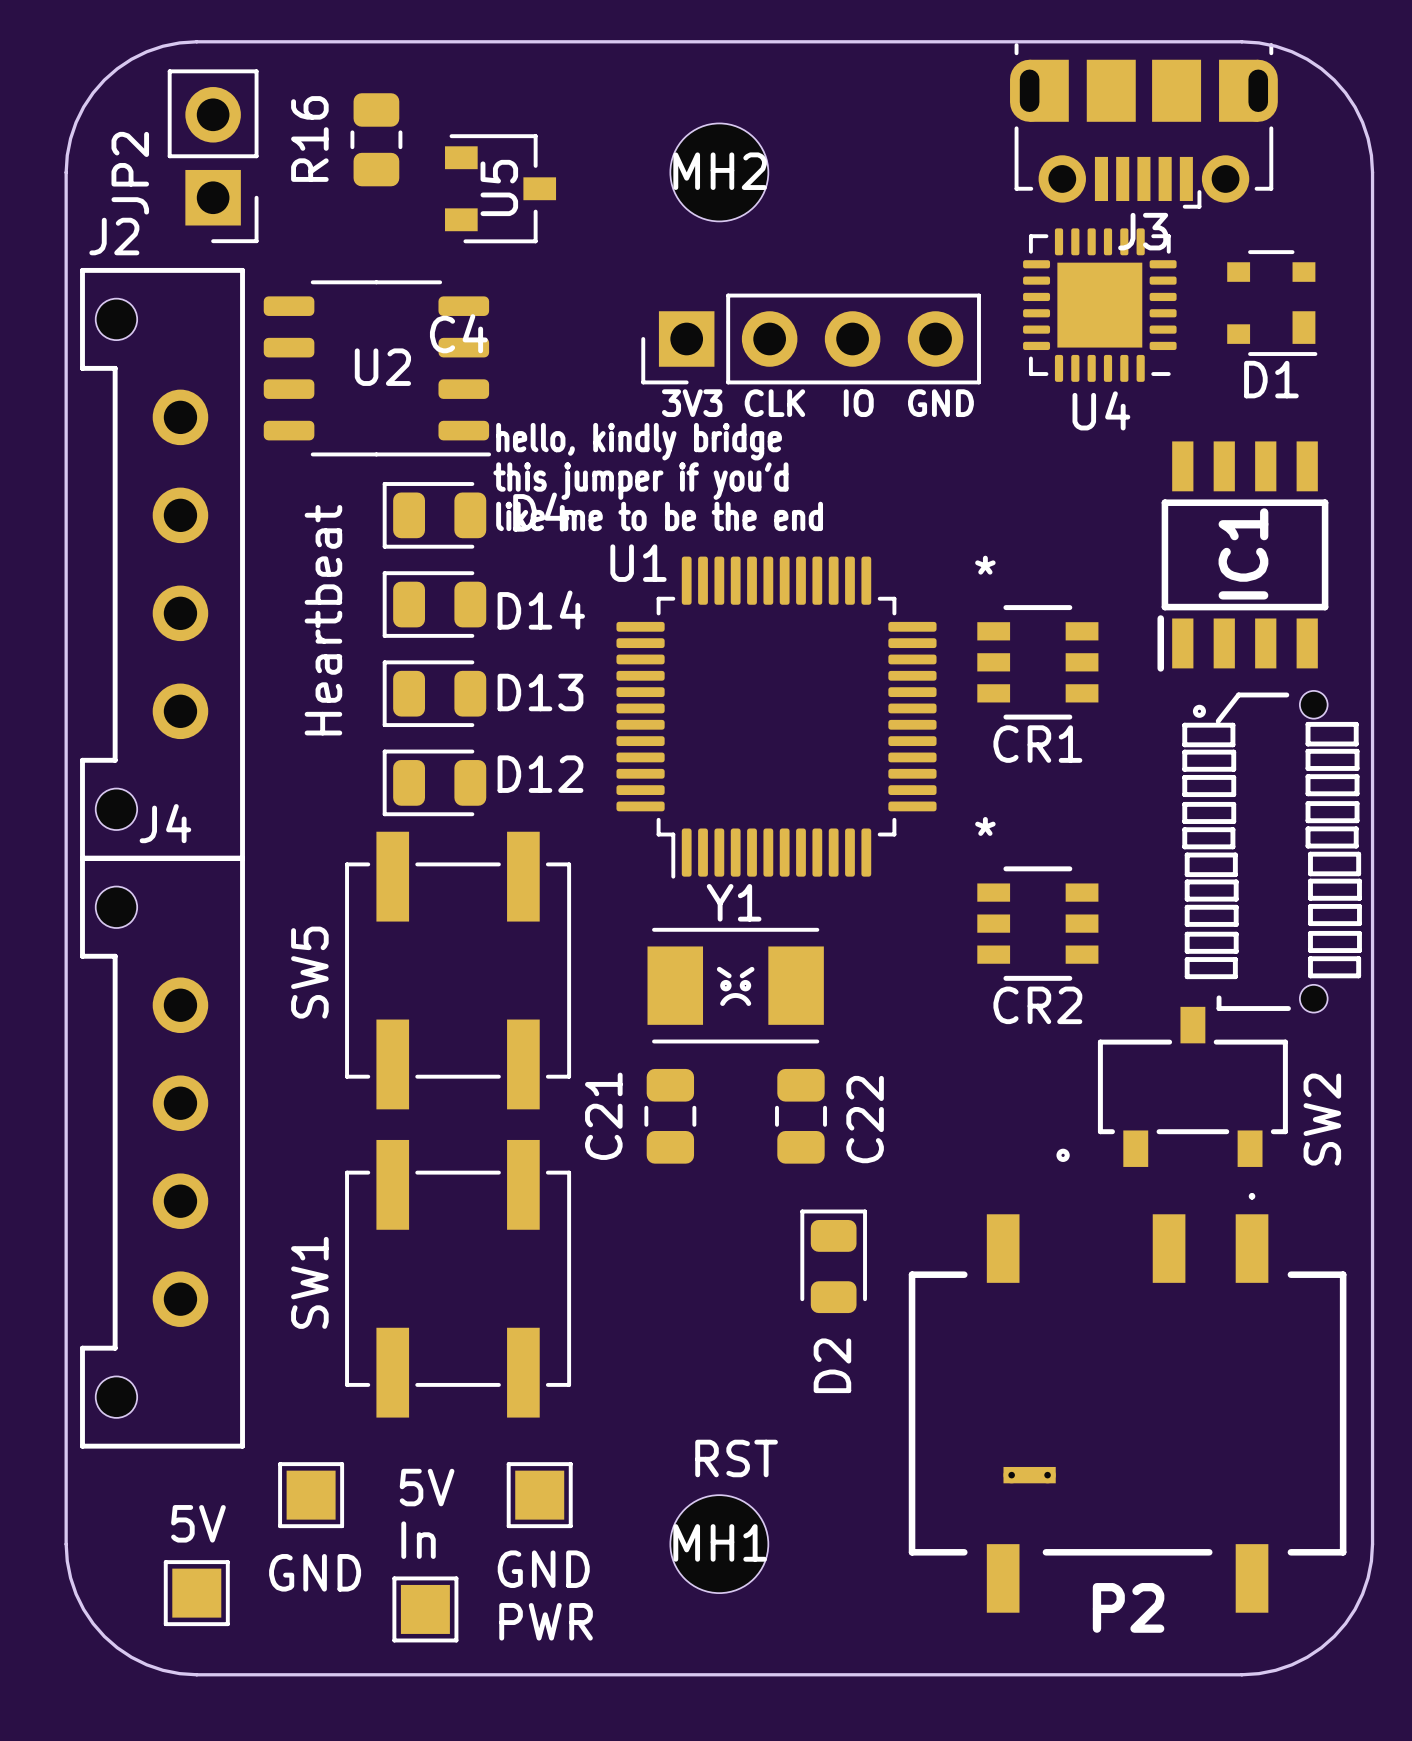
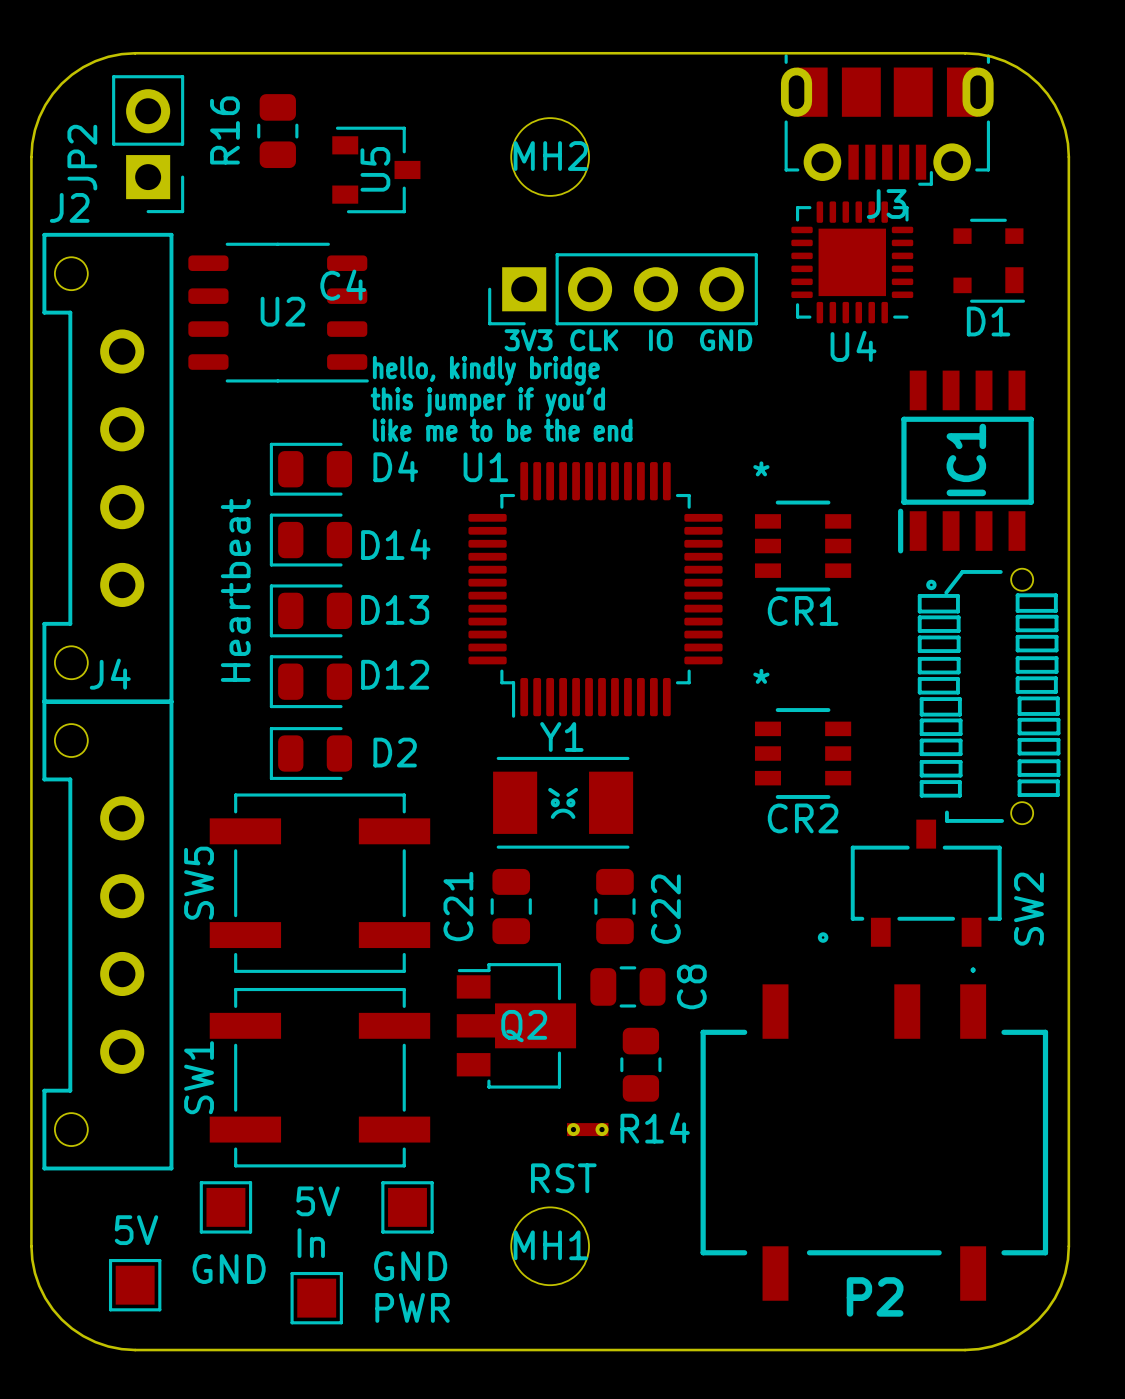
D4 position: (434, 515) -> (310, 469)
D14 position: (434, 604) -> (310, 540)
text position: Heartbeat (323, 620) -> Heartbeat (235, 590)
D13 position: (434, 693) -> (310, 610)
D12 position: (434, 782) -> (310, 681)
SW5 rotation: 0° (458, 970) -> 90° clockwise (319, 883)
C8: none -> (627, 986)
D2 rotation: 0° (833, 1261) -> 90° counterclockwise (310, 753)
D2 position: (833, 1261) -> (310, 753)
Q2: none -> (516, 1025)
SW1 rotation: 0° (458, 1278) -> 90° clockwise (319, 1077)
R14: none -> (640, 1064)
part position: (1029, 1475) -> (587, 1129)

